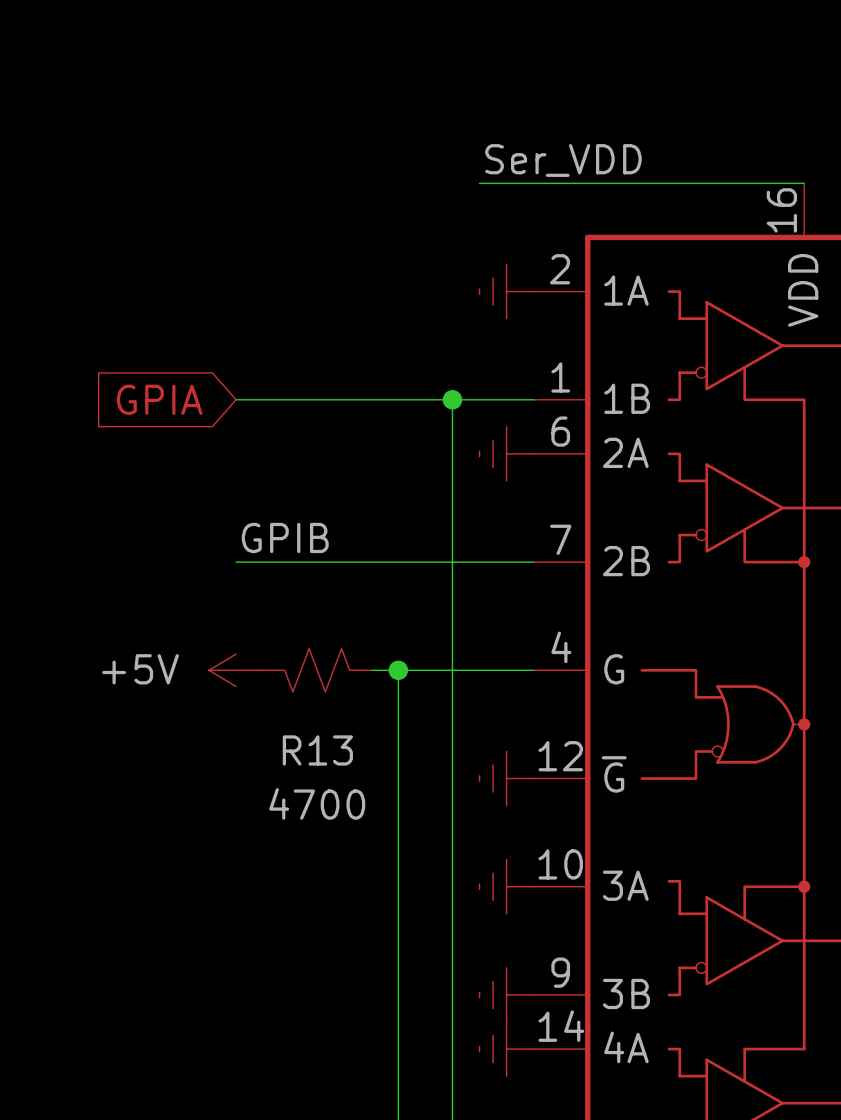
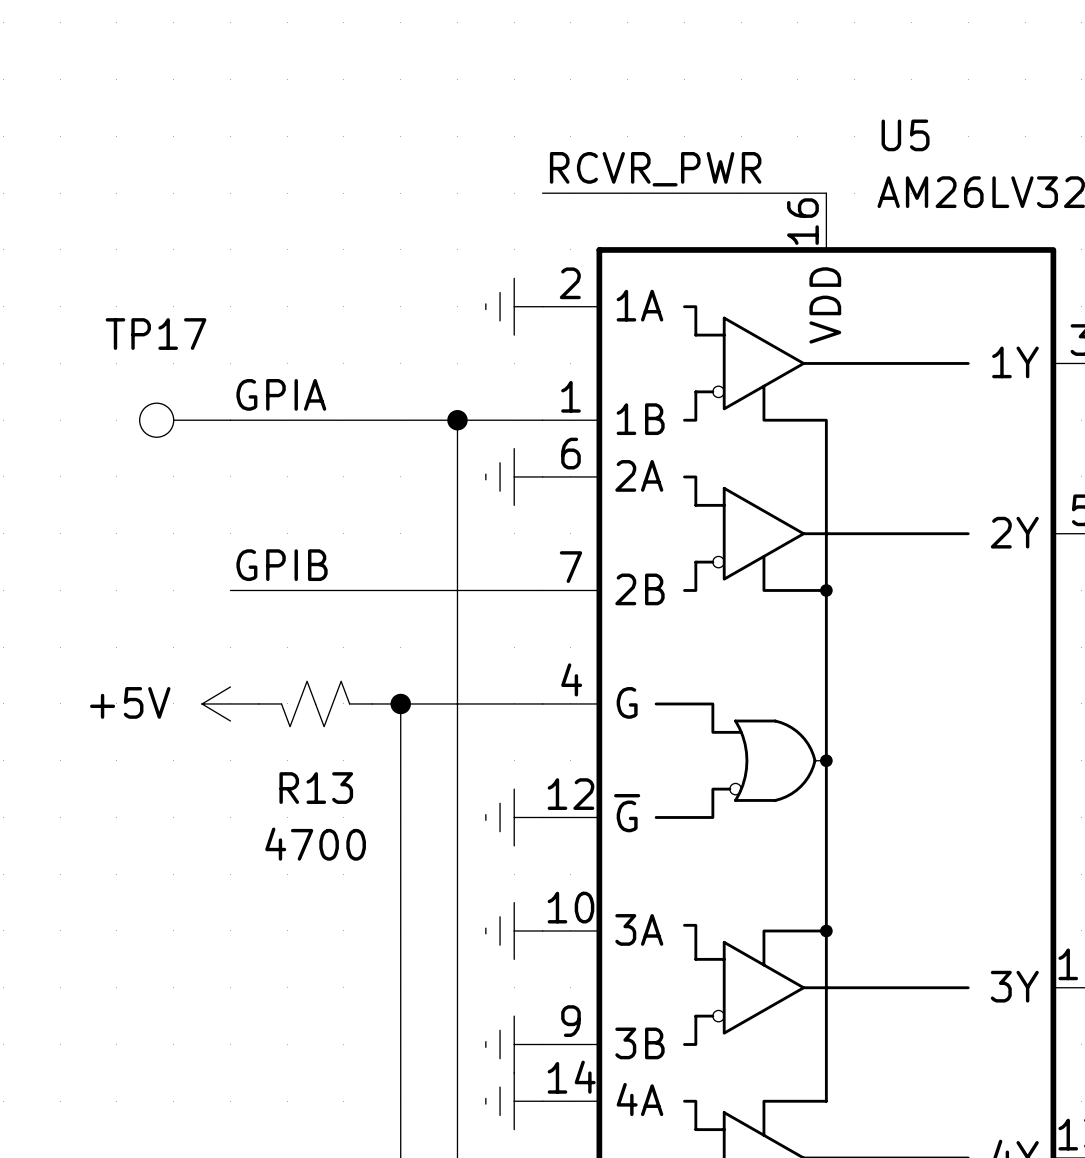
label: Ser_VDD (563, 160) -> none
label: none -> RCVR_PWR (655, 169)
wire: (479, 183) (533, 183) -> none
label: none -> GPIA (281, 394)
global label: GPIA (159, 399) -> none
TP17: none -> (185, 420)

